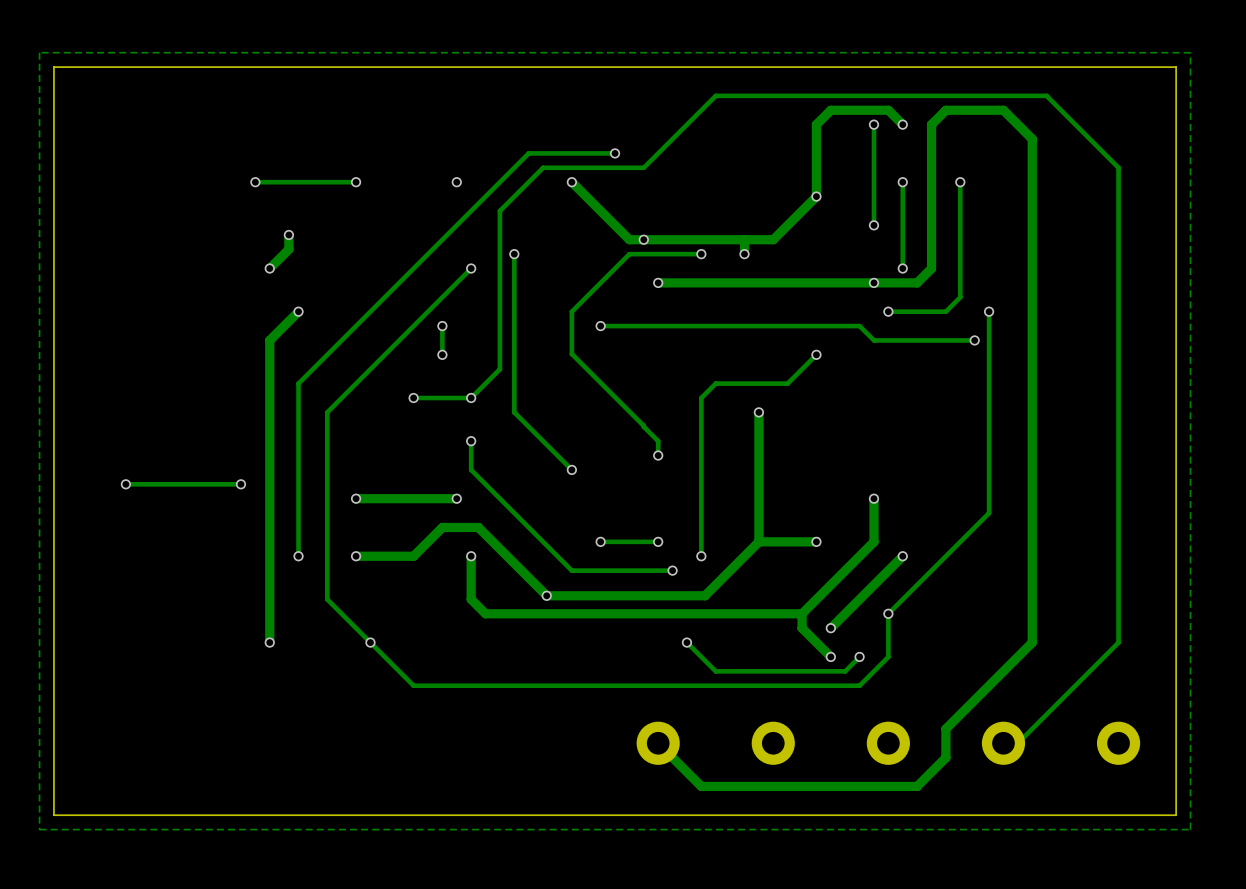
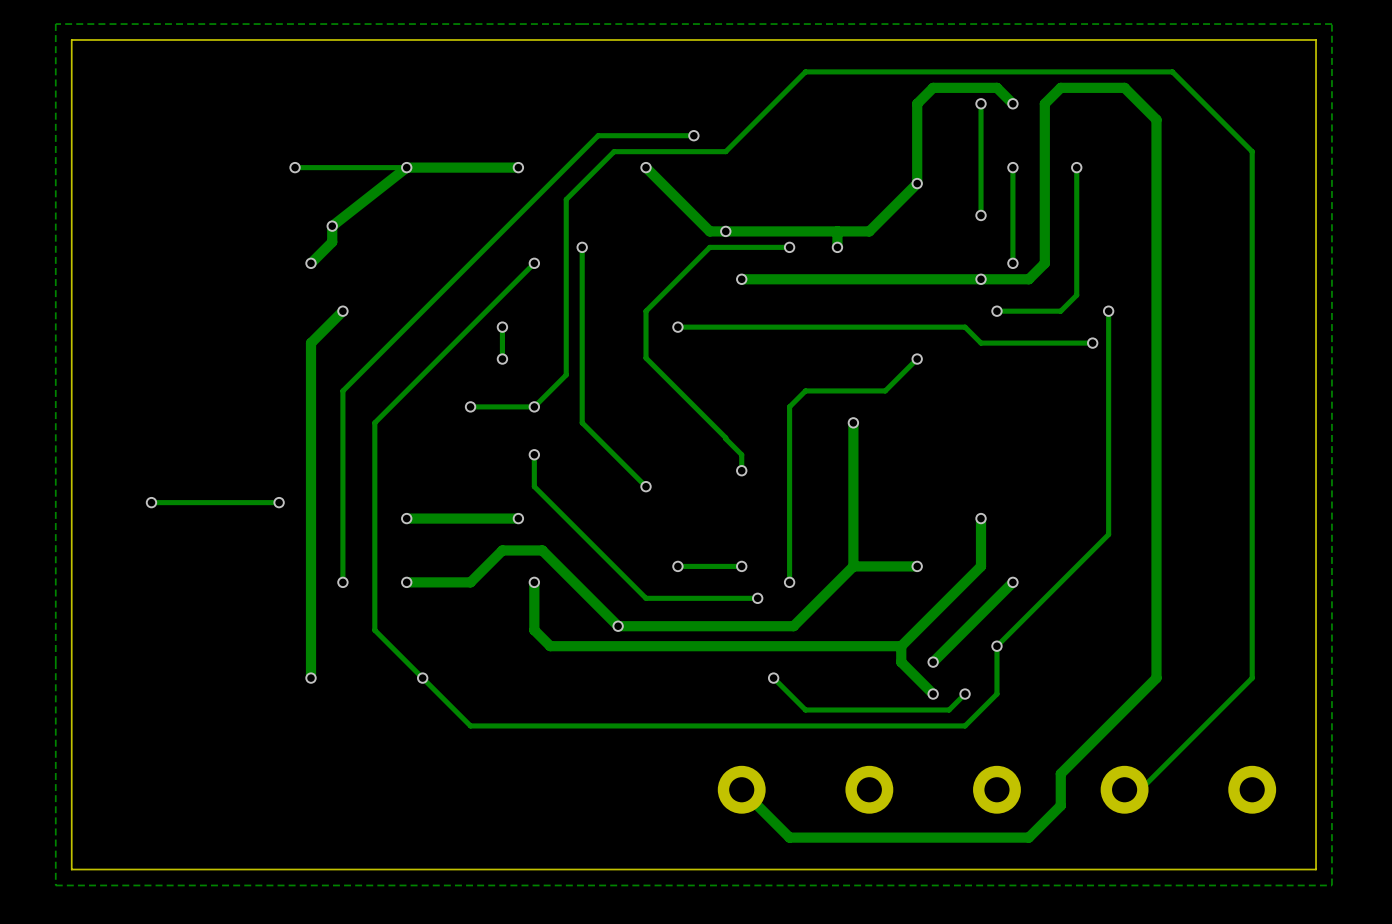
track: none -> (518, 167) (406, 167) (332, 226)

